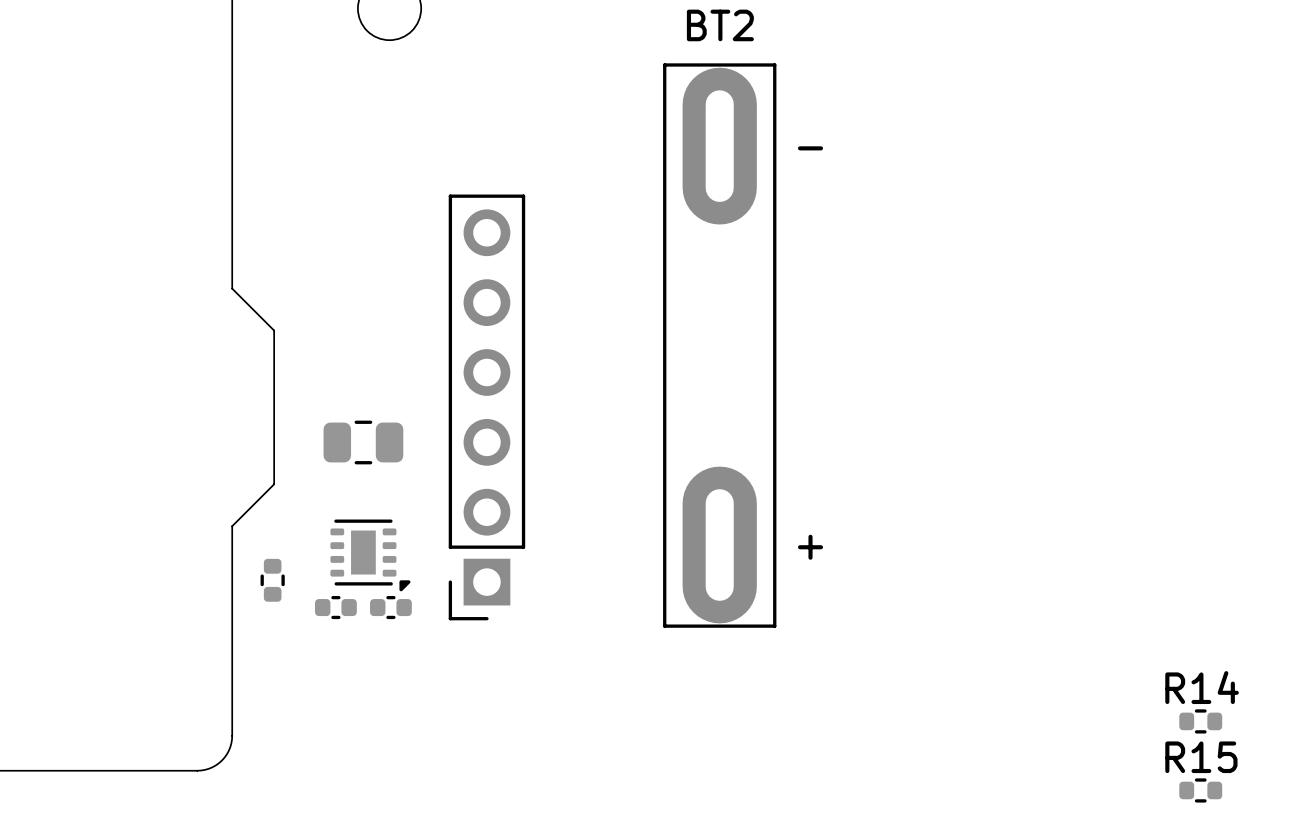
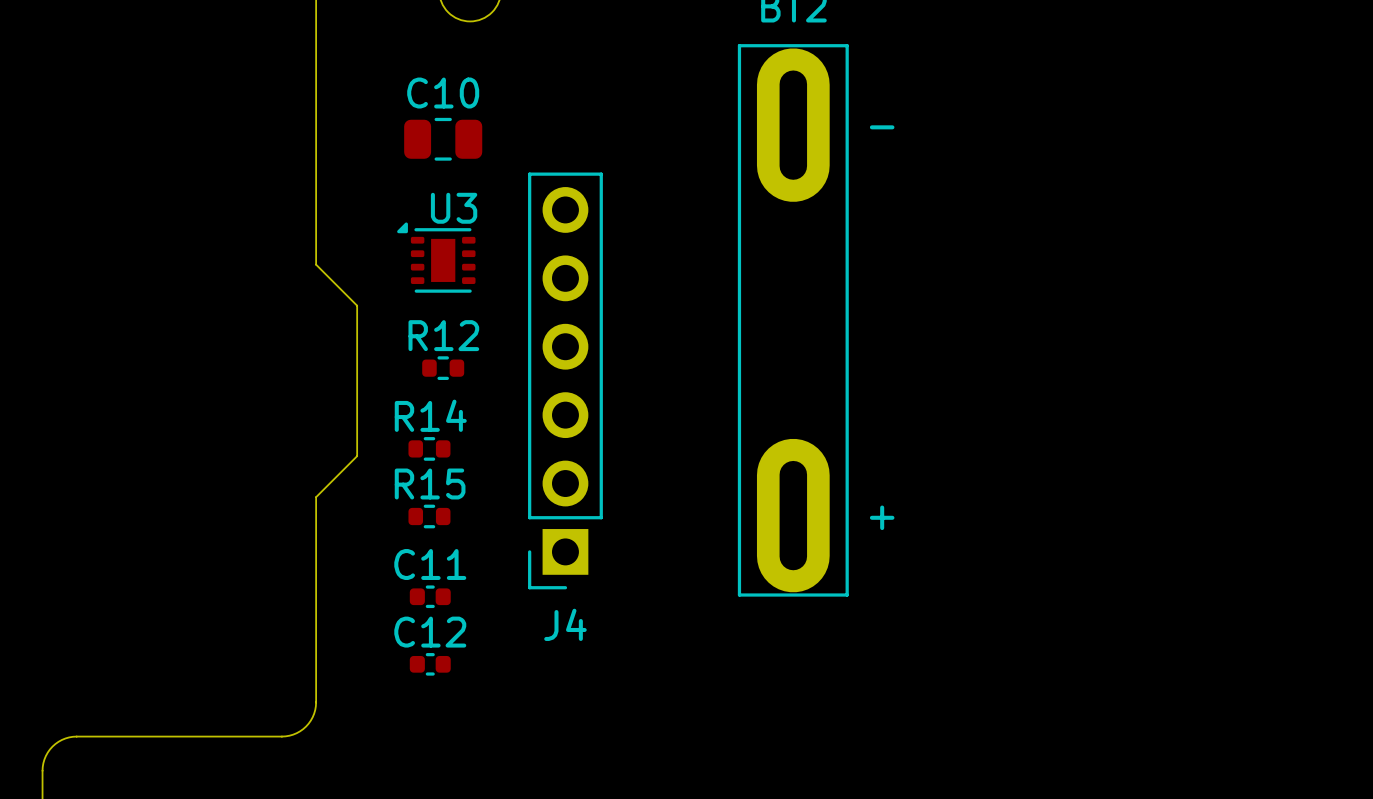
C10: none -> (443, 139)
U3: none -> (436, 257)
R12: none -> (443, 368)
part: (363, 442) -> none
part: (370, 555) -> none
part: (272, 580) -> none
part: (335, 607) -> none
part: (390, 607) -> none
C11: none -> (430, 596)
J4 name: none -> J4 (565, 624)
C12: none -> (430, 664)
R14 position: (1200, 721) -> (429, 448)
R15 position: (1200, 790) -> (429, 516)

